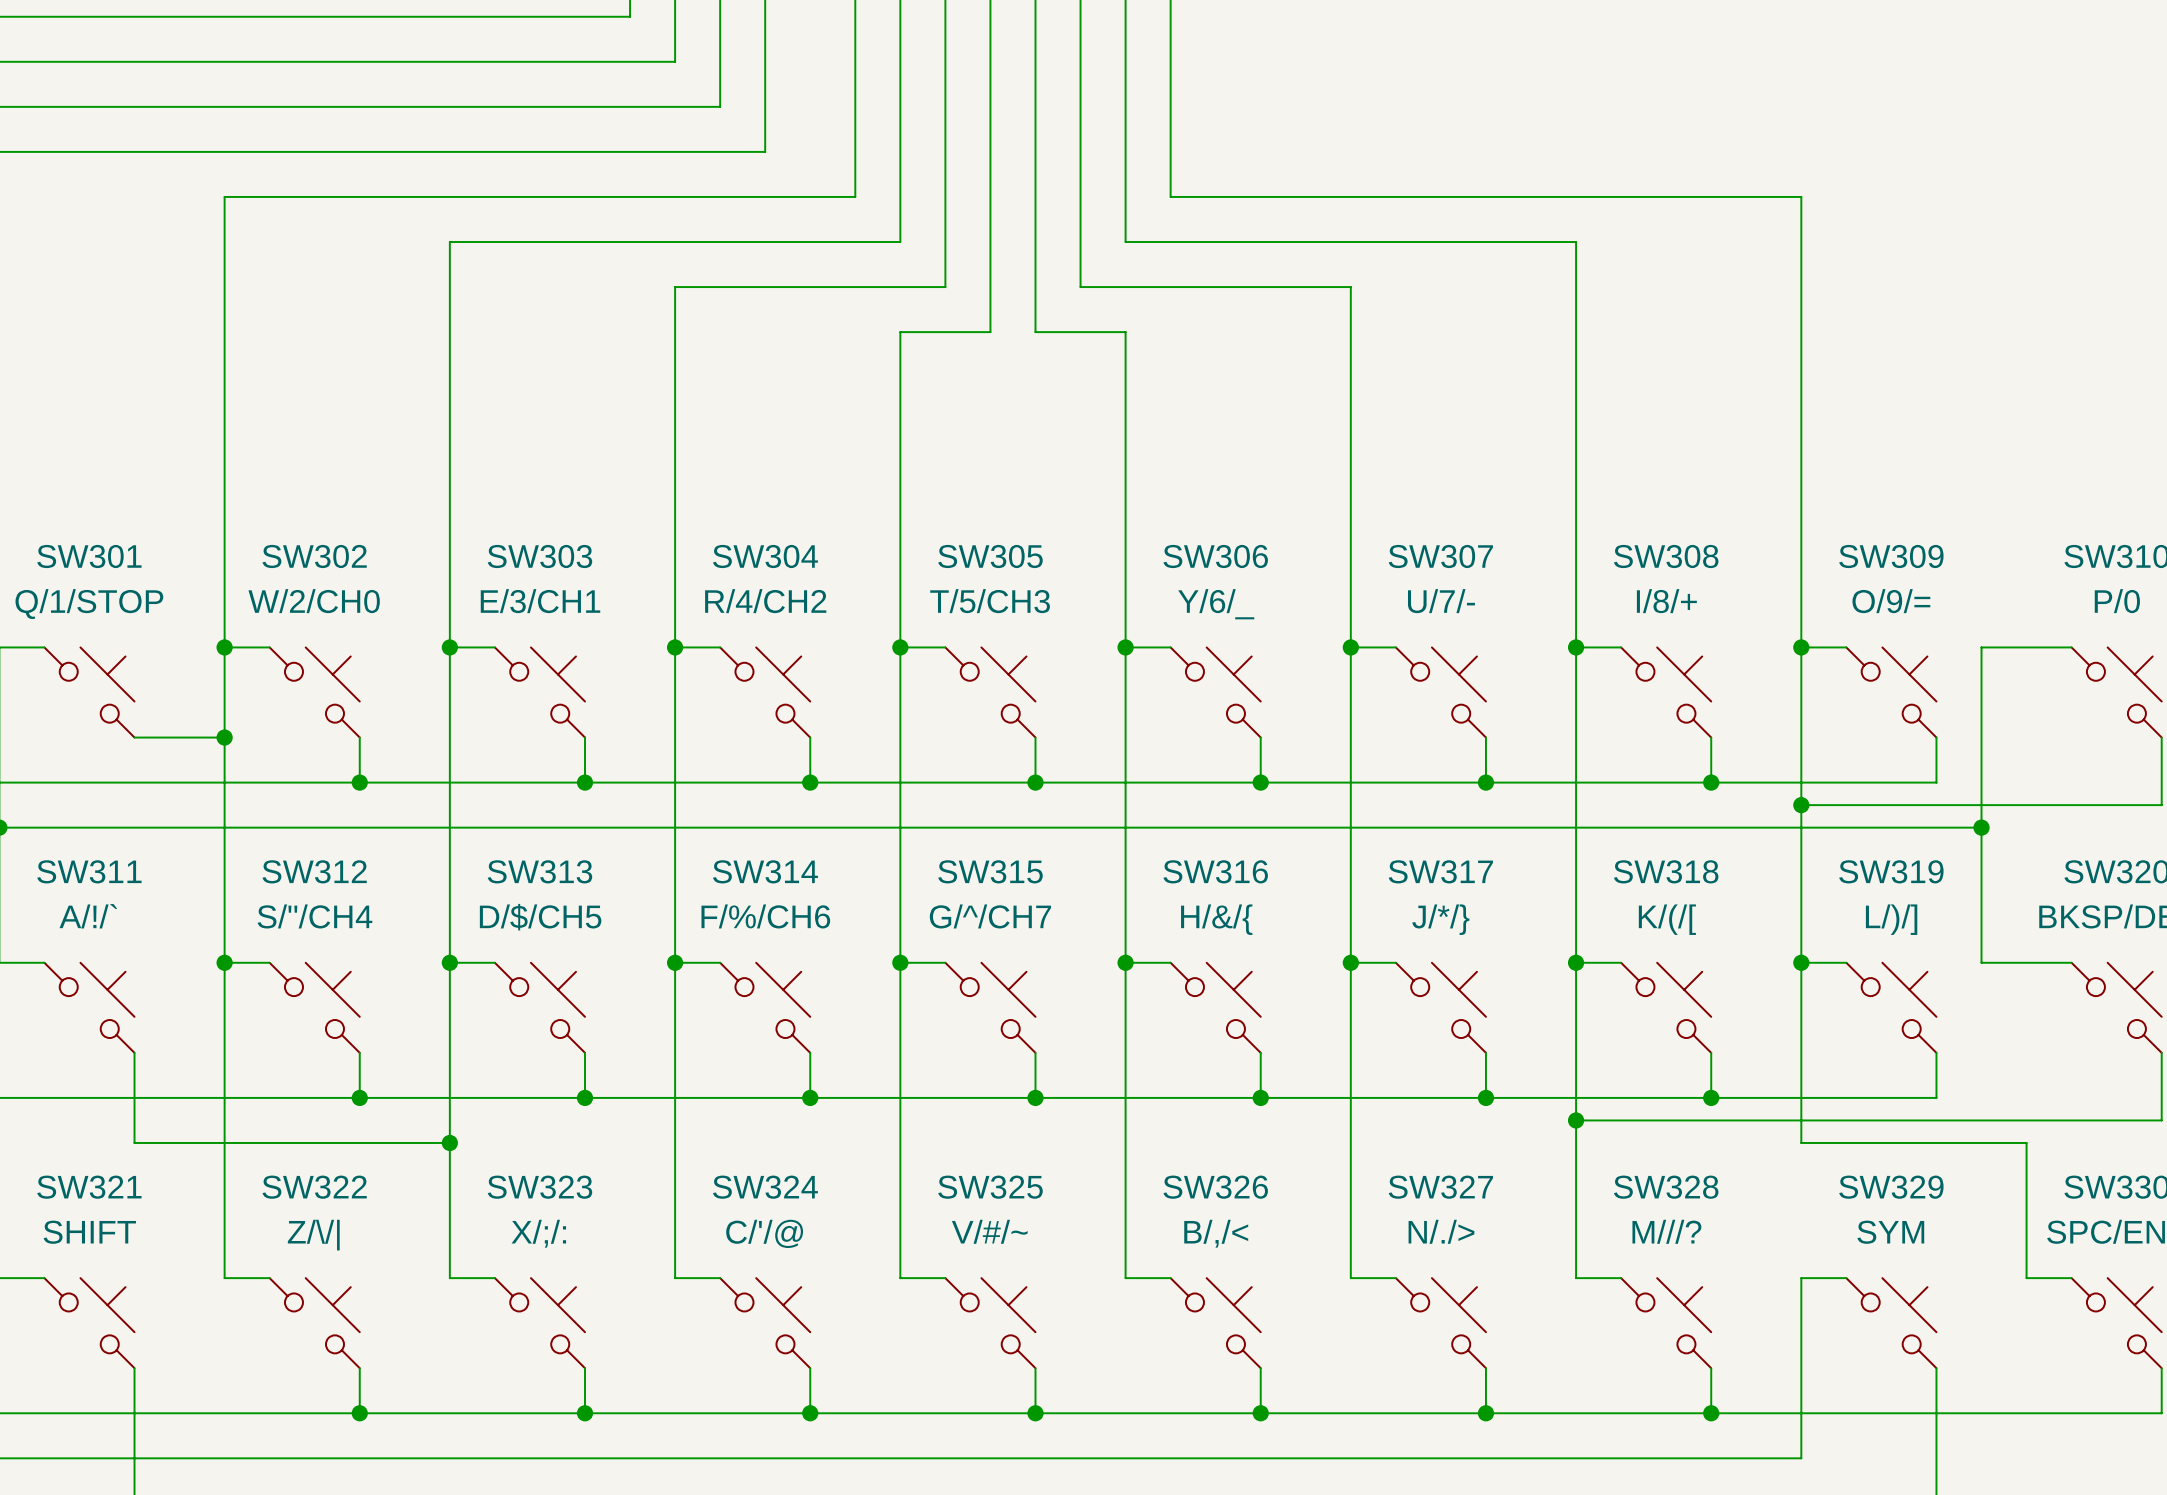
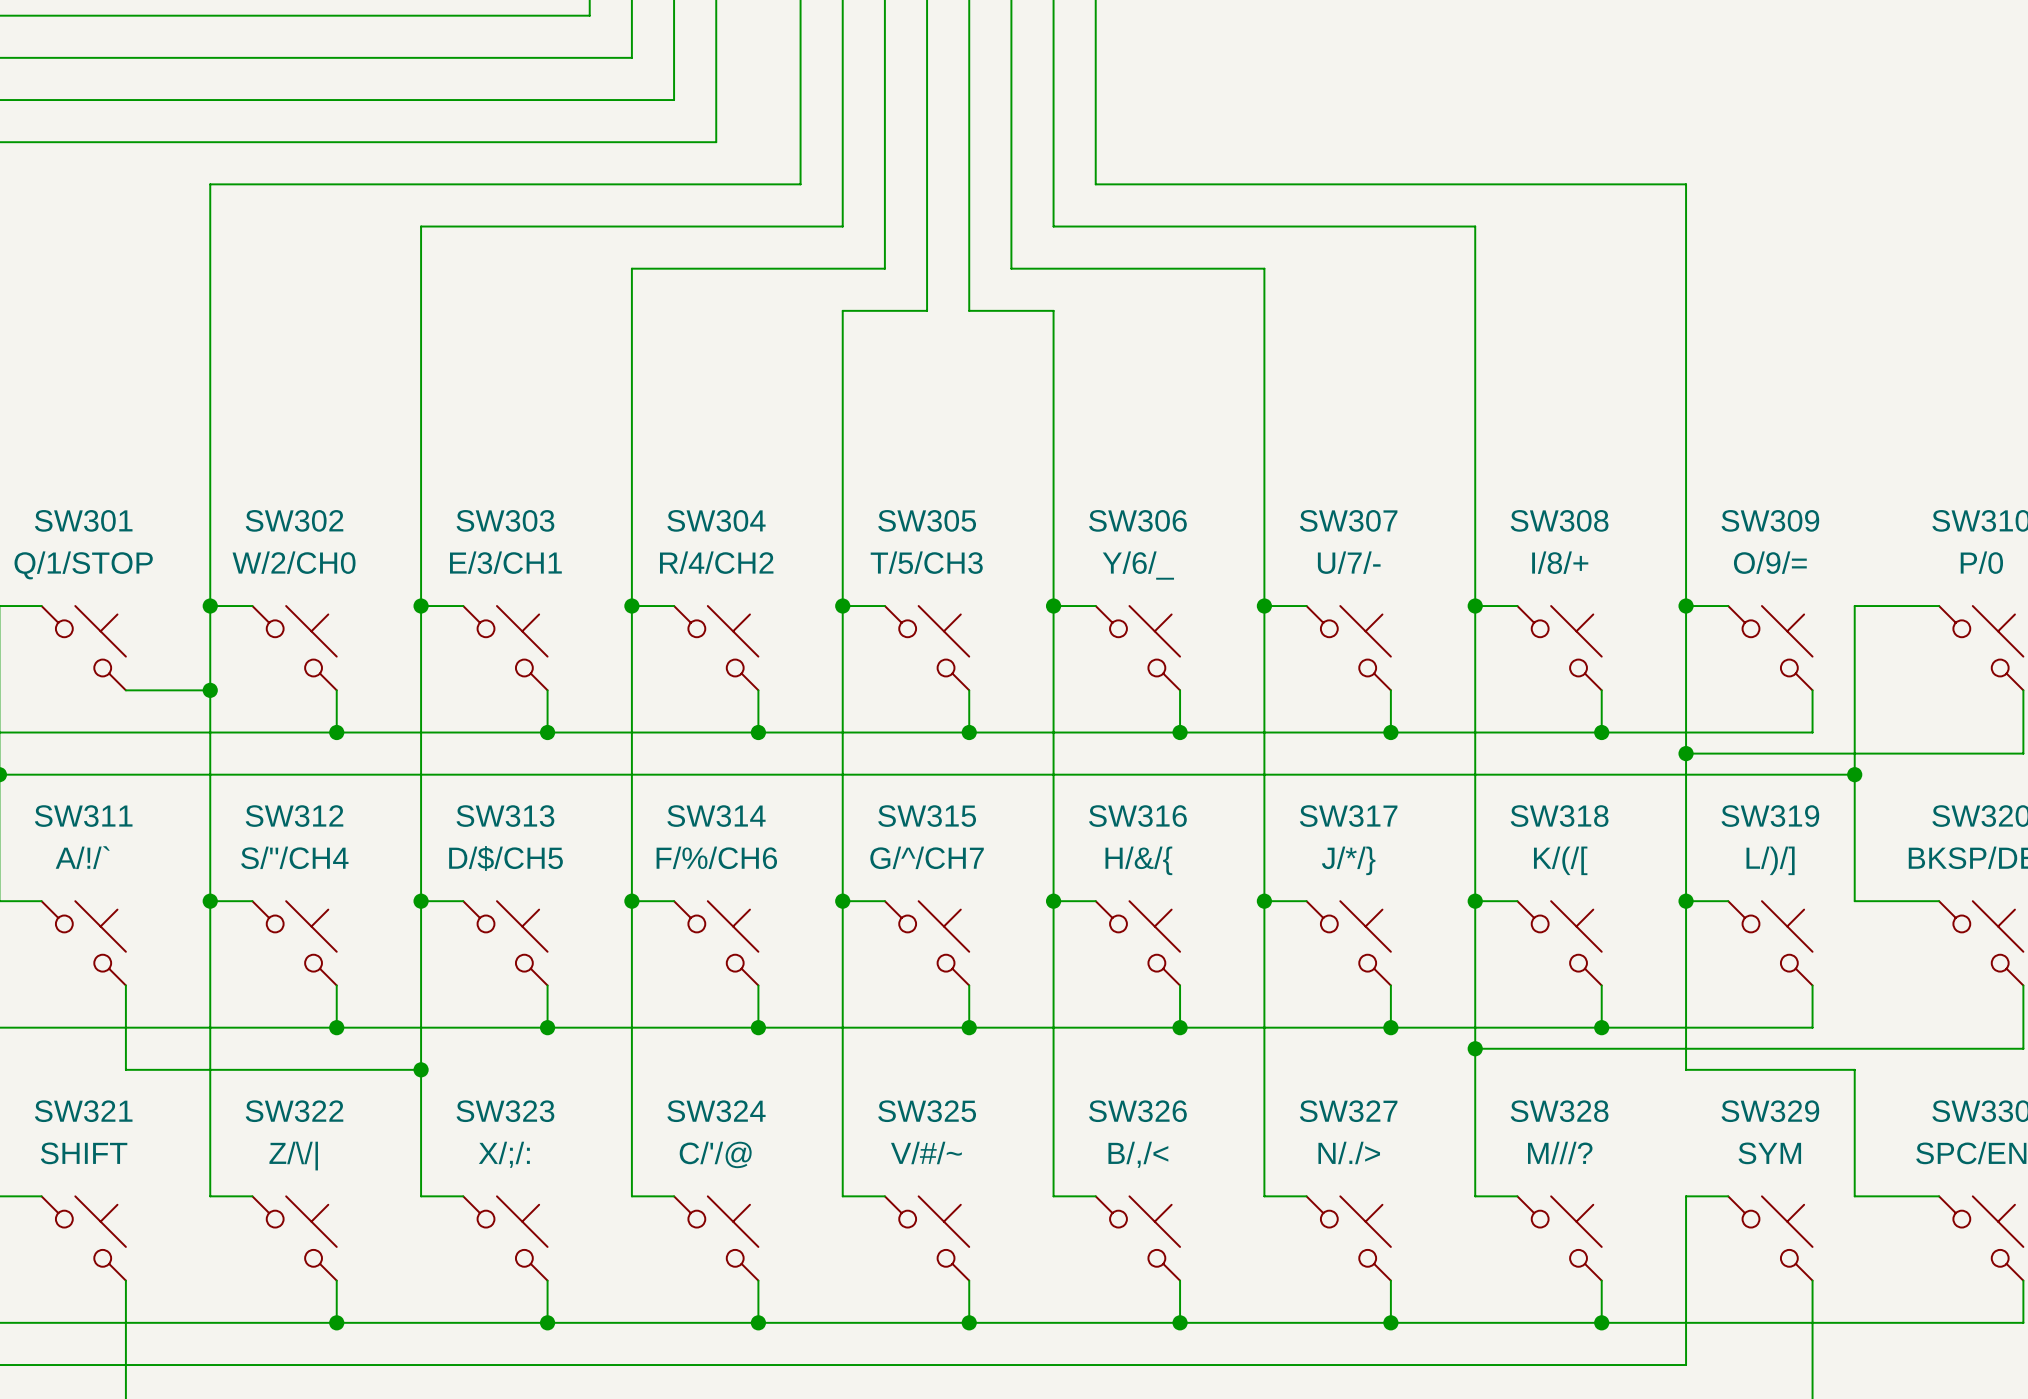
wire: (1981, 1142) (2026, 1142) (2026, 1278) -> (1854, 1069) (1854, 1196) (1896, 1196)

